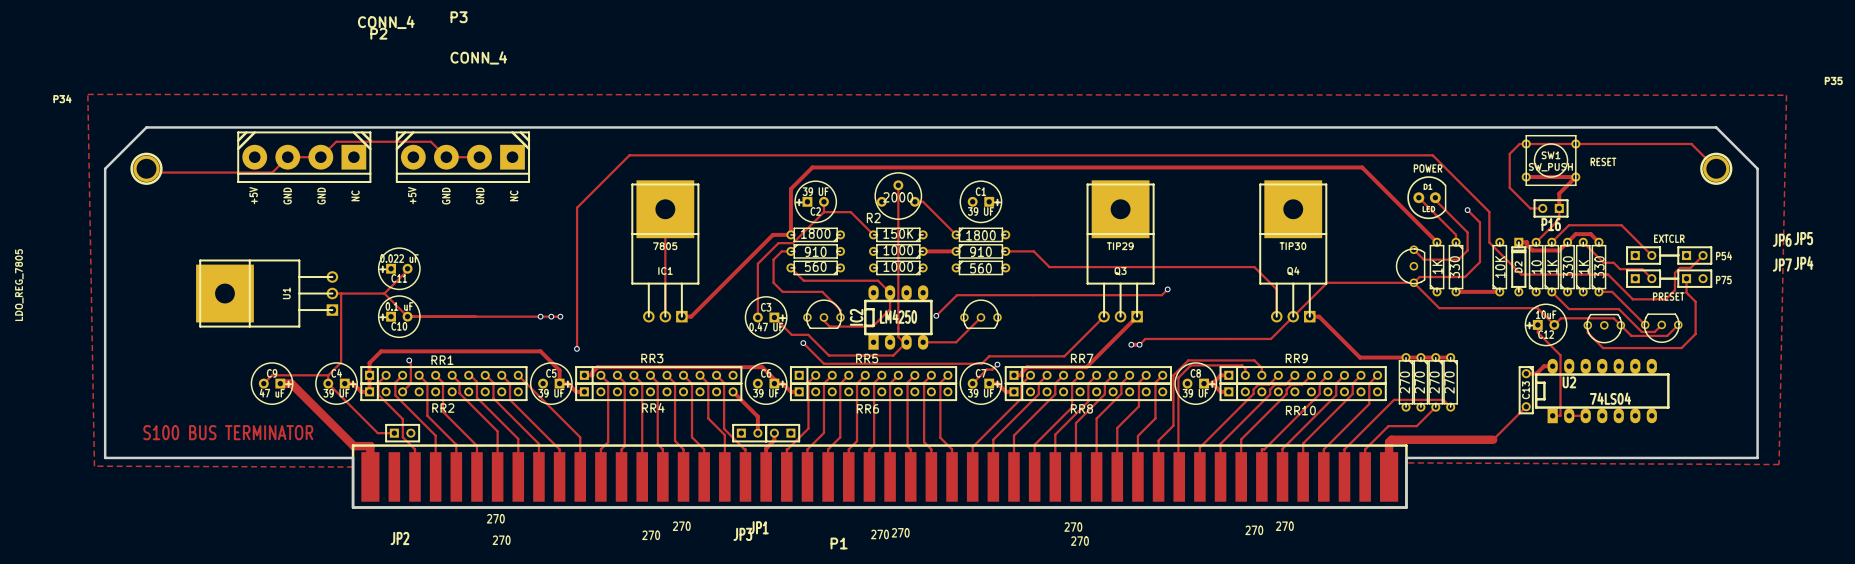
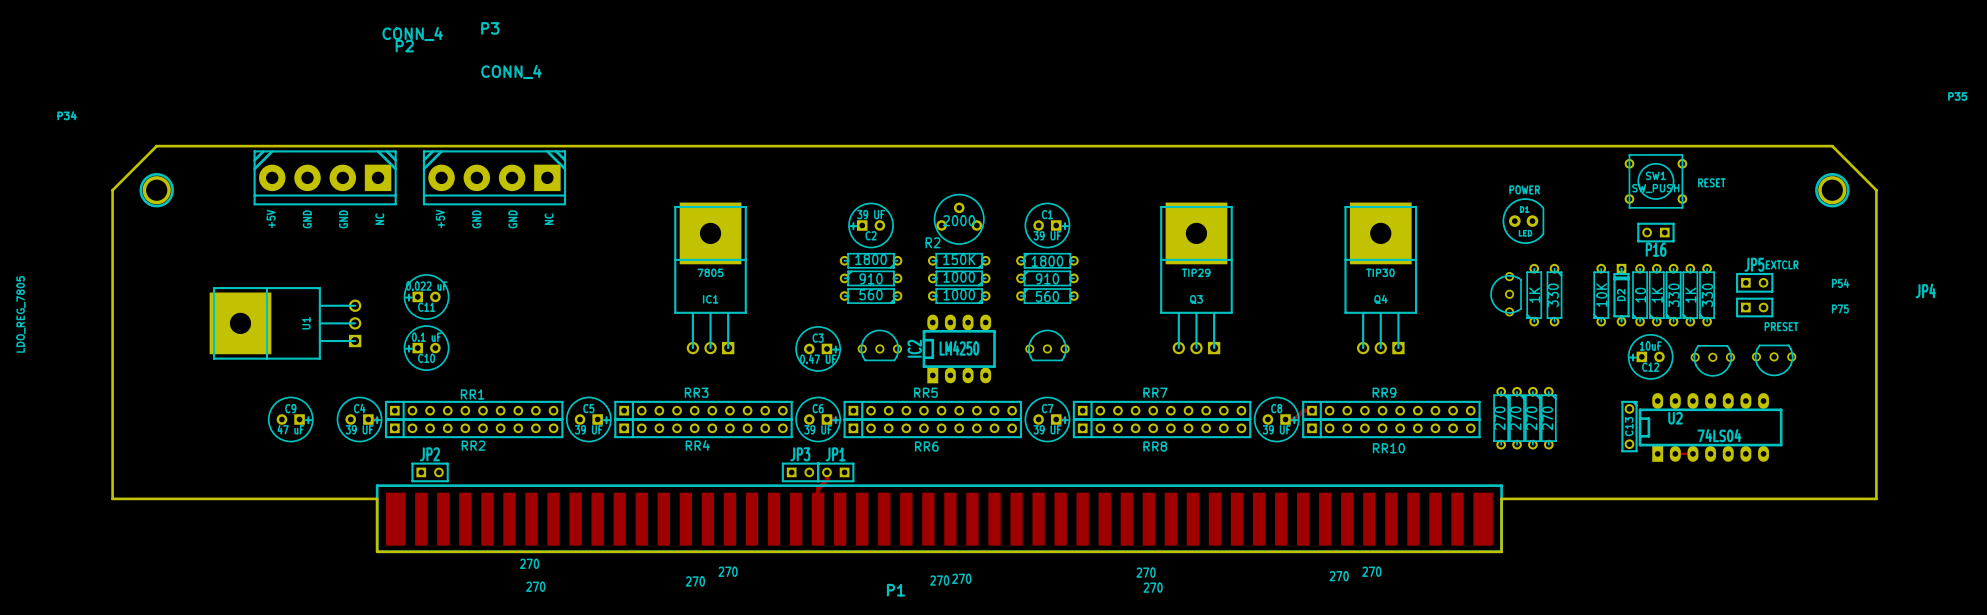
zone outline: (87, 94) (94, 466) (353, 467) (353, 445) (1406, 445) (1406, 462) (1779, 464) (1786, 95) (87, 94) -> none
track: (479, 157) (446, 157) (430, 141) (336, 141) (320, 157) (287, 157) (272, 172) (150, 172) (146, 168) -> none
track: (1716, 168) (1691, 143) (1519, 143) (1509, 153) (1509, 187) (1530, 208) (1542, 208) -> none
track: (1526, 177) (1575, 177) (1559, 193) (1559, 219) (1536, 242) -> none
track: (898, 185) (898, 336) (903, 342) (906, 342) (893, 355) (828, 355) (808, 334) (791, 334) (774, 317) -> none
track: (1418, 197) (1456, 234) (1456, 242) -> none
track: (1435, 197) (1435, 200) (1467, 232) (1467, 250) (1458, 259) (1423, 259) (1413, 249) -> none
track: (823, 201) (823, 212) -> none
track: (914, 201) (923, 201) (956, 234) -> none
track: (665, 209) (665, 316) -> none
track: (1467, 210) (1479, 222) (1479, 262) (1465, 277) (1419, 277) (1413, 282) -> none
via: (1467, 210) -> none
track: (823, 212) (850, 212) (873, 234) -> none
track: (823, 212) (792, 243) (778, 243) (757, 263) (757, 317) -> none
JP5 name position: JP5 (1803, 238) -> JP5 (1754, 264)
track: (1437, 242) (1362, 167) (812, 167) (790, 188) (790, 234) (772, 234) (691, 316) (681, 316) -> none
track: (1518, 242) (1526, 242) (1532, 250) (1559, 250) (1575, 234) (1590, 234) (1598, 242) -> none
track: (1551, 242) (1568, 225) (1621, 225) (1651, 255) -> none
track: (1583, 242) (1603, 262) (1613, 262) (1620, 269) (1642, 269) (1651, 278) -> none
track: (790, 251) (781, 251) (773, 259) (773, 282) (782, 291) (822, 291) (840, 310) (840, 317) -> none
track: (923, 251) (956, 251) -> none
track: (1005, 251) (1033, 251) (1049, 267) (1254, 267) (1276, 289) (1276, 316) -> none
line: (1678, 254) (1660, 255) -> none
JP6: (1694, 255) -> none
track: (1703, 255) (1690, 267) (1679, 267) (1674, 272) (1674, 290) (1665, 299) (1632, 299) (1608, 274) (1521, 274) (1489, 242) (1489, 211) (1432, 155) (629, 155) (577, 207) (577, 348) -> none
track: (790, 267) (803, 280) (878, 280) (890, 292) (890, 309) (872, 326) (829, 326) (823, 320) (823, 317) -> none
track: (407, 268) (384, 293) -> none
line: (1660, 278) (1678, 278) -> none
track: (1686, 278) (1686, 292) (1695, 301) (1695, 334) (1681, 348) (1603, 348) (1587, 332) (1587, 325) -> none
JP7: (1694, 278) -> none
track: (1413, 282) (1327, 282) (1270, 338) (1145, 338) (1139, 344) (1131, 344) -> none
track: (1413, 282) (1439, 308) (1537, 308) (1554, 324) (1560, 318) (1613, 318) (1631, 335) (1667, 335) (1678, 324) -> none
track: (1167, 289) (1161, 295) (956, 295) (936, 315) -> none
via: (1167, 289) -> none
track: (1456, 291) (1499, 291) -> none
track: (1551, 291) (1569, 309) (1618, 309) (1641, 331) (1654, 331) (1661, 324) -> none
track: (1598, 291) (1612, 291) (1645, 324) -> none
track: (332, 293) (384, 293) -> none
track: (341, 293) (341, 362) (328, 375) -> none
track: (384, 293) (407, 316) (560, 316) -> none
via: (936, 315) -> none
via: (540, 316) -> none
via: (551, 316) -> none
via: (560, 316) -> none
track: (1104, 316) (1064, 356) (989, 356) (981, 363) (823, 363) (803, 343) -> none
track: (1137, 316) (1086, 367) (1027, 367) (1022, 372) (1022, 375) (1014, 375) -> none
track: (1309, 316) (1319, 316) (1360, 357) (1450, 357) -> none
track: (980, 317) (956, 342) (923, 342) -> none
track: (1537, 324) (1537, 332) (1560, 355) (1560, 415) (1552, 415) -> none
via: (803, 343) -> none
via: (1131, 344) -> none
via: (1139, 344) -> none
via: (576, 348) -> none
track: (409, 360) (410, 362) (410, 383) (402, 391) -> none
via: (409, 360) -> none
track: (997, 364) (992, 369) (986, 369) (972, 383) -> none
via: (997, 364) -> none
track: (1552, 366) (1544, 366) (1536, 373) (1526, 373) -> none
track: (328, 375) (272, 375) (263, 383) -> none
track: (328, 375) (328, 383) (377, 433) (394, 433) -> none
track: (386, 375) (378, 382) (378, 394) (402, 419) (402, 437) (415, 449) (415, 476) -> none
track: (402, 375) (395, 382) (395, 395) (435, 435) (435, 476) -> none
track: (419, 375) (427, 383) (427, 415) (456, 444) (456, 476) -> none
track: (435, 375) (443, 382) (443, 411) (476, 445) (476, 476) -> none
track: (452, 375) (459, 382) (459, 393) (497, 431) (497, 476) -> none
track: (468, 375) (476, 381) (476, 397) (518, 438) (518, 476) -> none
track: (485, 375) (493, 382) (493, 398) (538, 443) (538, 476) -> none
track: (501, 375) (510, 383) (510, 399) (559, 449) (559, 476) -> none
track: (518, 375) (580, 437) (580, 476) -> none
track: (584, 375) (592, 375) (592, 372) (597, 367) (762, 367) (778, 383) -> none
track: (600, 375) (608, 382) (608, 442) (600, 449) (600, 476) -> none
track: (617, 375) (624, 382) (624, 446) (621, 449) (621, 476) -> none
track: (633, 375) (642, 383) (642, 476) -> none
track: (650, 375) (657, 382) (657, 444) (662, 449) (662, 476) -> none
track: (667, 375) (675, 383) (675, 440) (683, 449) (683, 476) -> none
track: (683, 375) (692, 383) (692, 437) (704, 449) (704, 476) -> none
track: (700, 375) (708, 383) (708, 418) (724, 435) (724, 476) -> none
track: (716, 375) (724, 382) (724, 428) (745, 449) (745, 476) -> none
track: (815, 375) (808, 382) (808, 428) (786, 449) (786, 476) -> none
track: (832, 375) (823, 383) (823, 432) (807, 449) (807, 476) -> none
track: (848, 375) (840, 383) (840, 437) (828, 449) (828, 476) -> none
track: (865, 375) (857, 383) (857, 441) (848, 449) (848, 476) -> none
track: (881, 375) (874, 383) (874, 444) (869, 449) (869, 476) -> none
track: (898, 375) (890, 383) (890, 476) -> none
track: (914, 375) (907, 382) (907, 446) (910, 449) (910, 476) -> none
track: (931, 375) (924, 382) (924, 442) (931, 449) (931, 476) -> none
track: (947, 375) (940, 382) (940, 437) (952, 449) (952, 476) -> none
track: (1030, 375) (1021, 384) (1021, 398) (972, 447) (972, 476) -> none
track: (1047, 375) (1038, 383) (1038, 394) (993, 439) (993, 476) -> none
track: (1063, 375) (1055, 383) (1055, 394) (1014, 435) (1014, 476) -> none
track: (1080, 375) (1072, 383) (1072, 407) (1034, 444) (1034, 476) -> none
track: (1096, 375) (1088, 383) (1088, 401) (1055, 434) (1055, 476) -> none
track: (1113, 375) (1104, 383) (1104, 394) (1075, 423) (1075, 476) -> none
track: (1129, 375) (1121, 383) (1121, 393) (1096, 418) (1096, 476) -> none
track: (1146, 375) (1138, 382) (1138, 406) (1117, 428) (1117, 476) -> none
track: (1162, 375) (1155, 382) (1155, 418) (1137, 435) (1137, 476) -> none
track: (1245, 375) (1245, 368) (1242, 365) (1190, 365) (1178, 377) (1179, 476) -> none
track: (1261, 375) (1261, 367) (1254, 360) (1188, 360) (1173, 375) (1173, 425) (1158, 440) (1158, 476) -> none
track: (1278, 375) (1269, 384) (1258, 384) (1253, 389) (1253, 393) (1199, 447) (1199, 476) -> none
track: (1294, 375) (1285, 384) (1275, 384) (1270, 389) (1270, 394) (1220, 443) (1220, 476) -> none
track: (1311, 375) (1302, 384) (1291, 384) (1286, 389) (1286, 394) (1241, 439) (1241, 476) -> none
track: (1327, 375) (1319, 383) (1319, 394) (1264, 449) (1261, 449) (1261, 476) -> none
track: (1344, 375) (1336, 383) (1336, 395) (1282, 448) (1282, 476) -> none
track: (1361, 375) (1352, 383) (1352, 393) (1303, 443) (1303, 476) -> none
track: (1377, 375) (1369, 383) (1369, 404) (1323, 449) (1323, 476) -> none
track: (280, 383) (291, 383) (353, 446) (370, 446) (370, 476) -> none
track: (568, 383) (559, 383) (559, 370) (540, 351) (381, 351) (369, 362) (369, 391) (361, 391) (353, 383) -> none
track: (568, 383) (576, 391) (584, 391) -> none
track: (782, 383) (791, 391) (799, 391) -> none
track: (997, 383) (1005, 391) (1014, 391) -> none
track: (1212, 383) (1220, 391) (1228, 391) -> none
track: (733, 391) (757, 416) (757, 433) -> none
track: (1526, 406) (1493, 439) (1391, 439) (1389, 442) (1389, 476) -> none
track: (1435, 407) (1416, 426) (1388, 426) (1365, 449) (1365, 476) -> none
track: (1450, 407) (1443, 399) (1394, 399) (1344, 449) (1344, 476) -> none
text: S100 BUS TERMINATOR (228, 432) -> none
JP1 name position: JP1 (759, 527) -> JP1 (835, 454)
JP3 name position: JP3 (742, 534) -> JP3 (800, 454)
JP2 name position: JP2 (399, 538) -> JP2 (429, 454)

